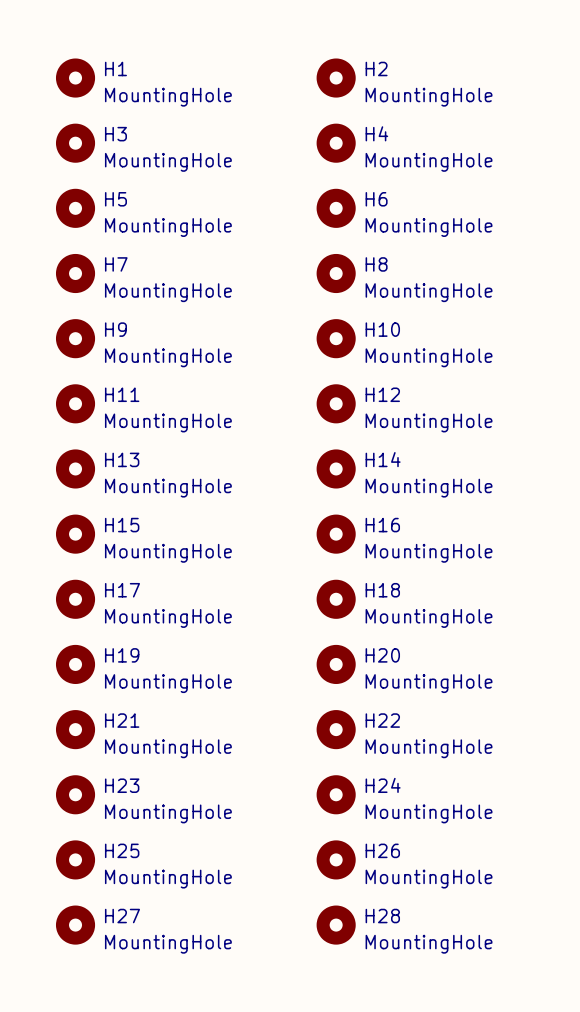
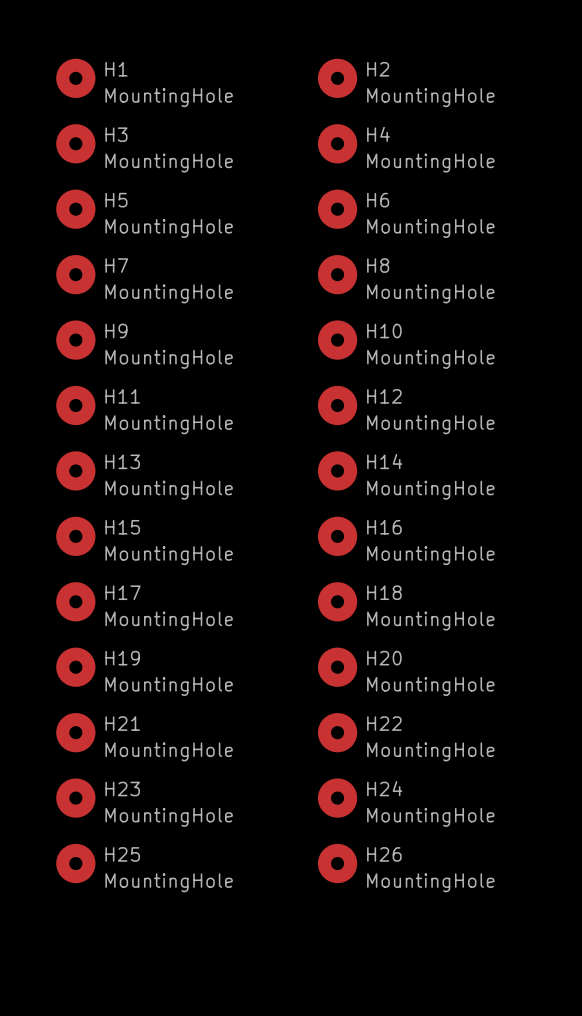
H27: MountingHole (75, 925) -> none
H28: MountingHole (336, 925) -> none

